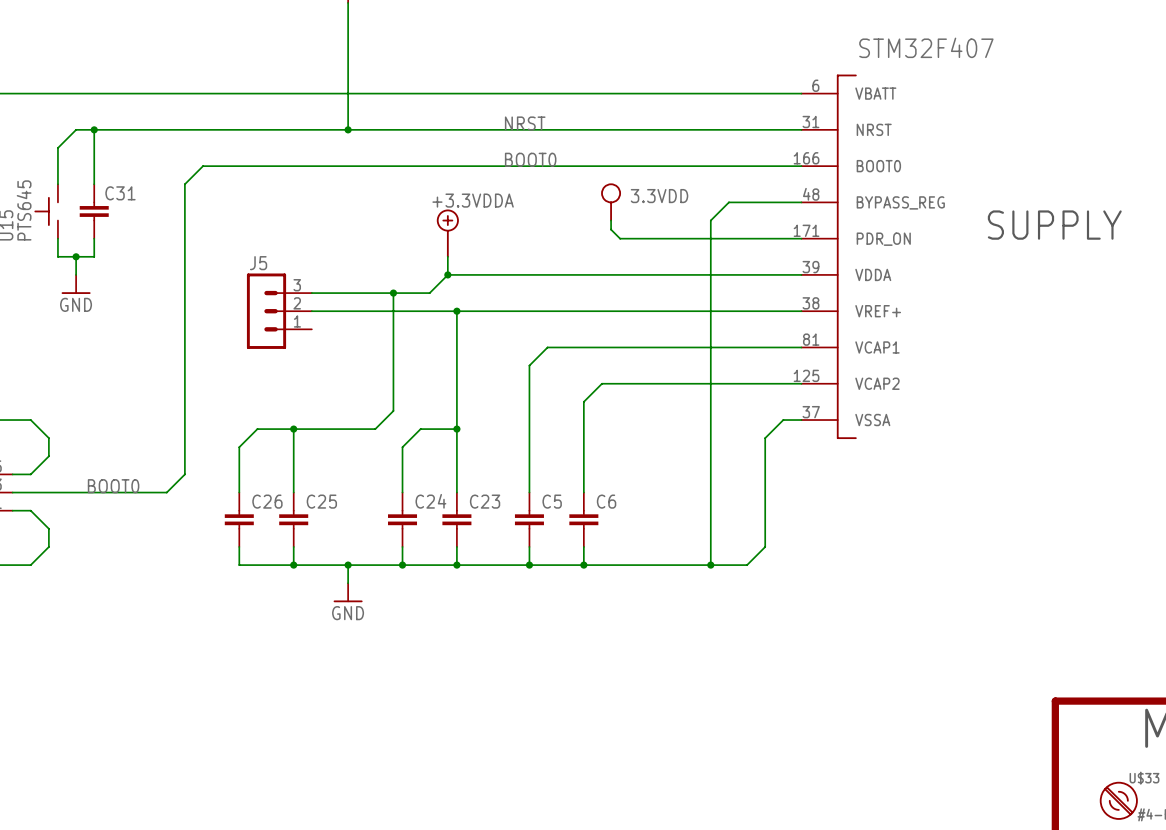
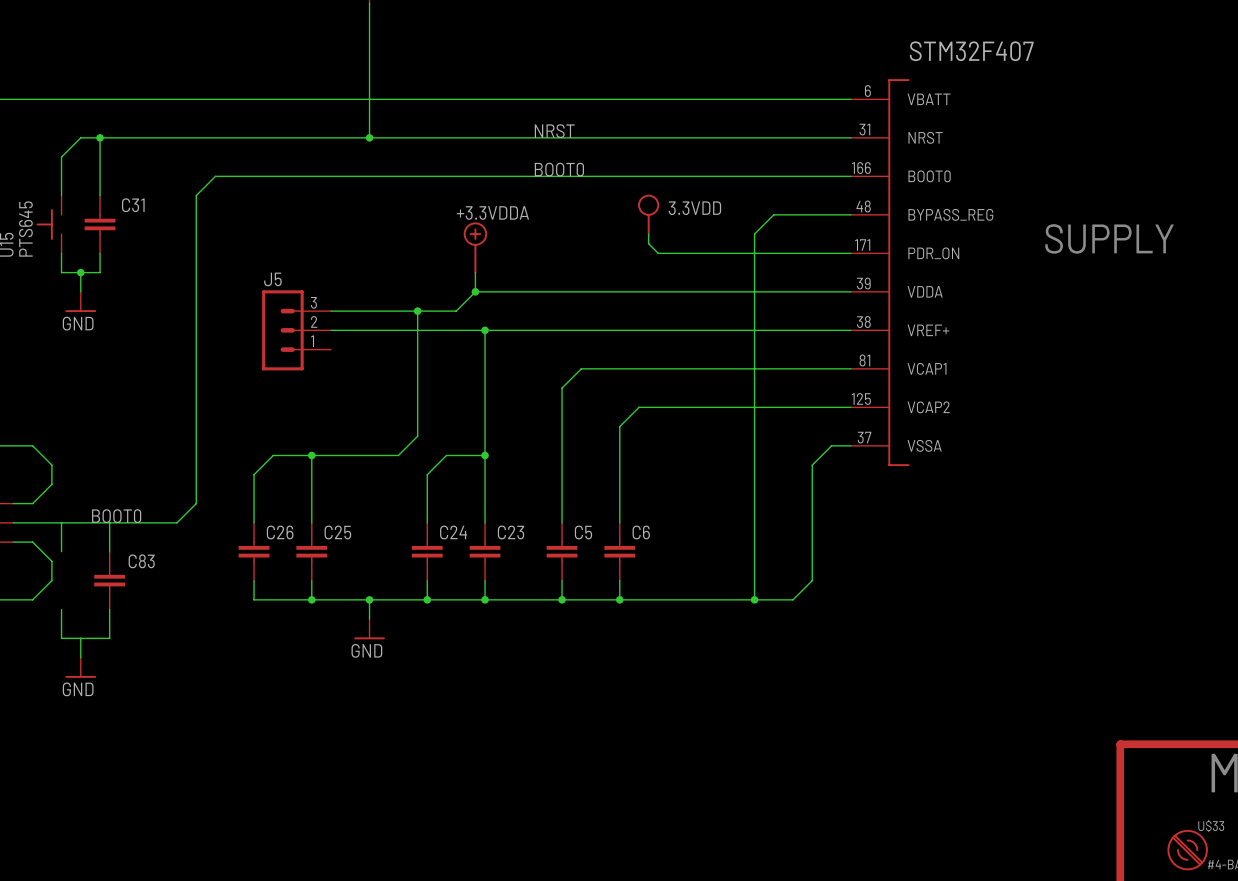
wire: none -> (61, 522) (61, 551)
wire: none -> (109, 522) (109, 551)
C83: none -> (109, 580)
wire: none -> (61, 609) (61, 638) (109, 638) (109, 609)
wire: none -> (80, 638) (80, 657)
power symbol: none -> GND (80, 667)

